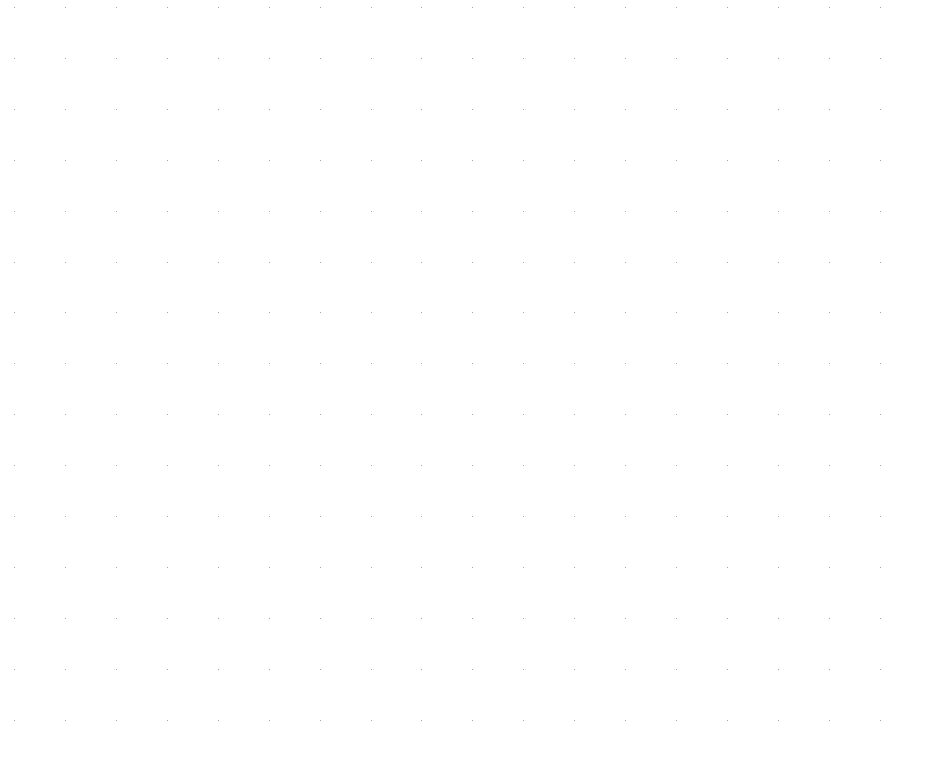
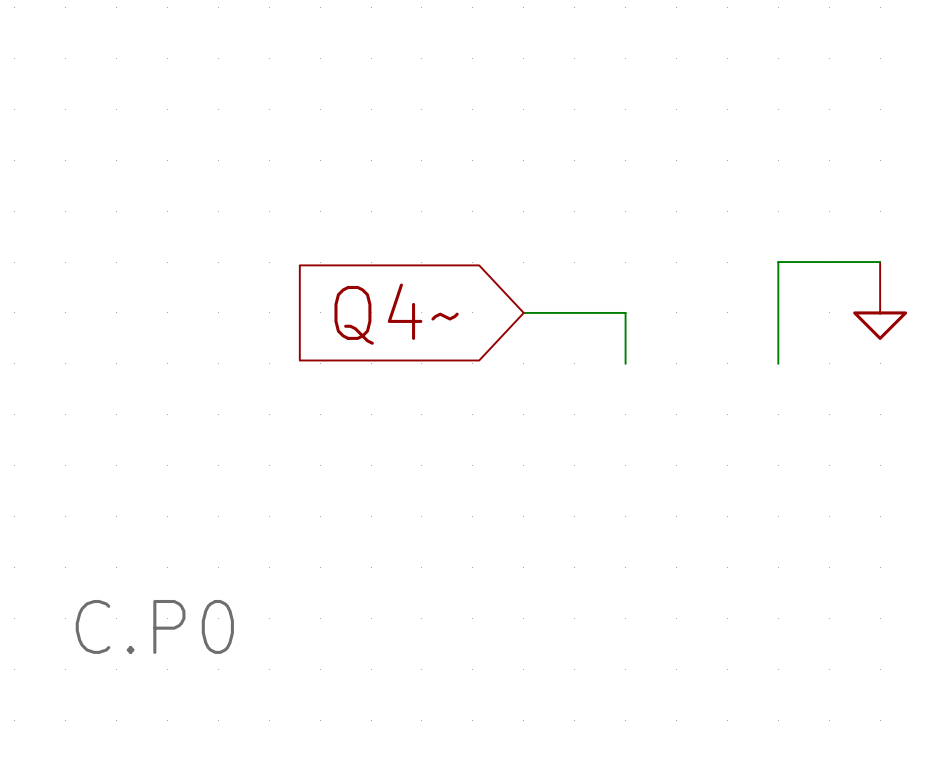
wire: none -> (880, 262) (778, 262) (778, 363)
power symbol: none -> (880, 300)
wire: none -> (523, 312) (625, 312) (625, 363)
global label: none -> Q4~ (396, 314)
label: none -> C.P0 (154, 626)

